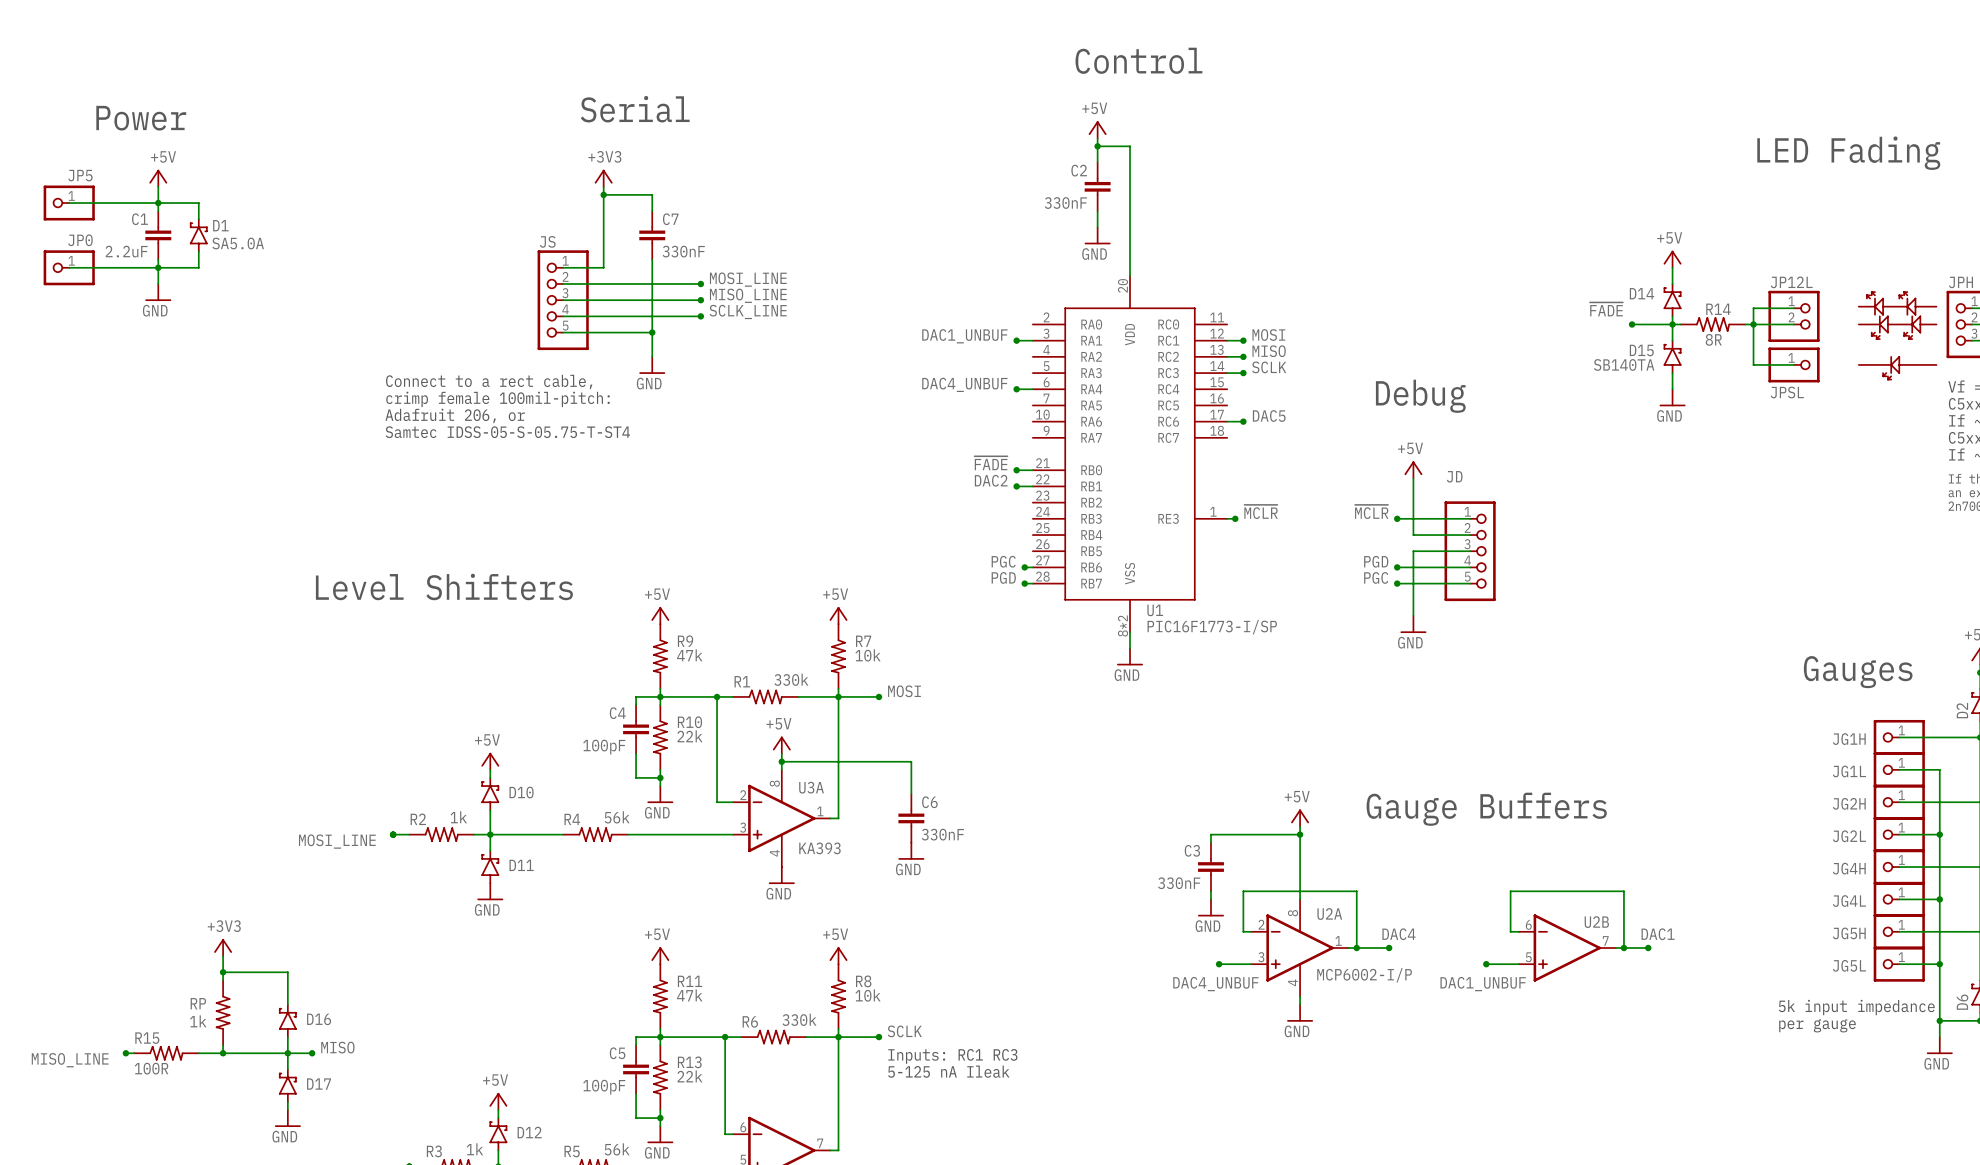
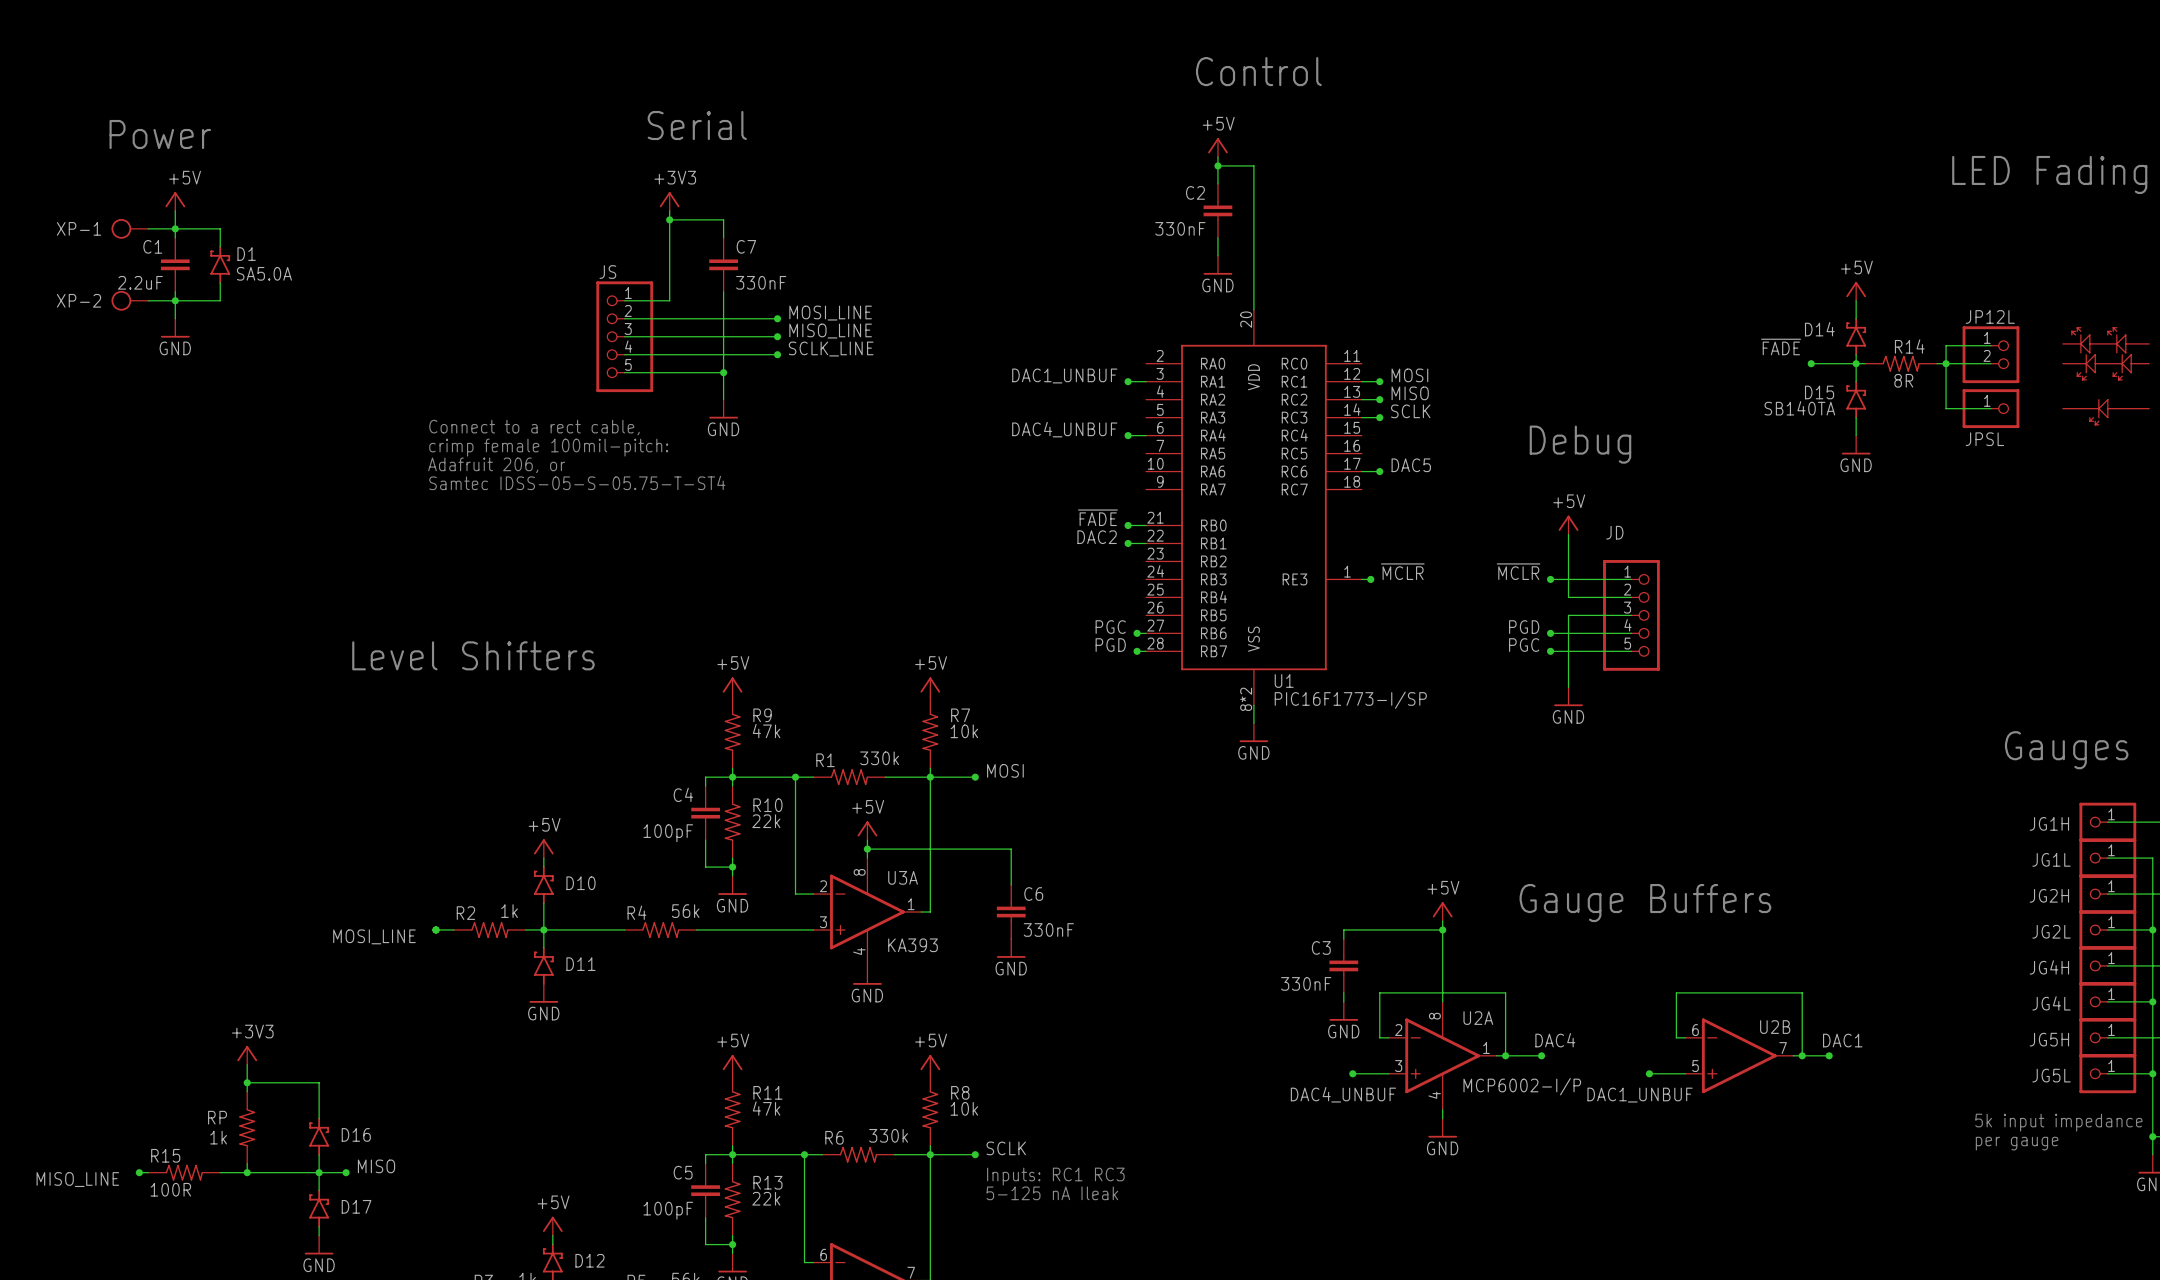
wire: (69, 203) (134, 203) -> none
JP5: (69, 203) -> none
XP-1: none -> (129, 228)
wire: (69, 267) (134, 267) -> none
JP0: (69, 267) -> none
XP-2: none -> (129, 300)

